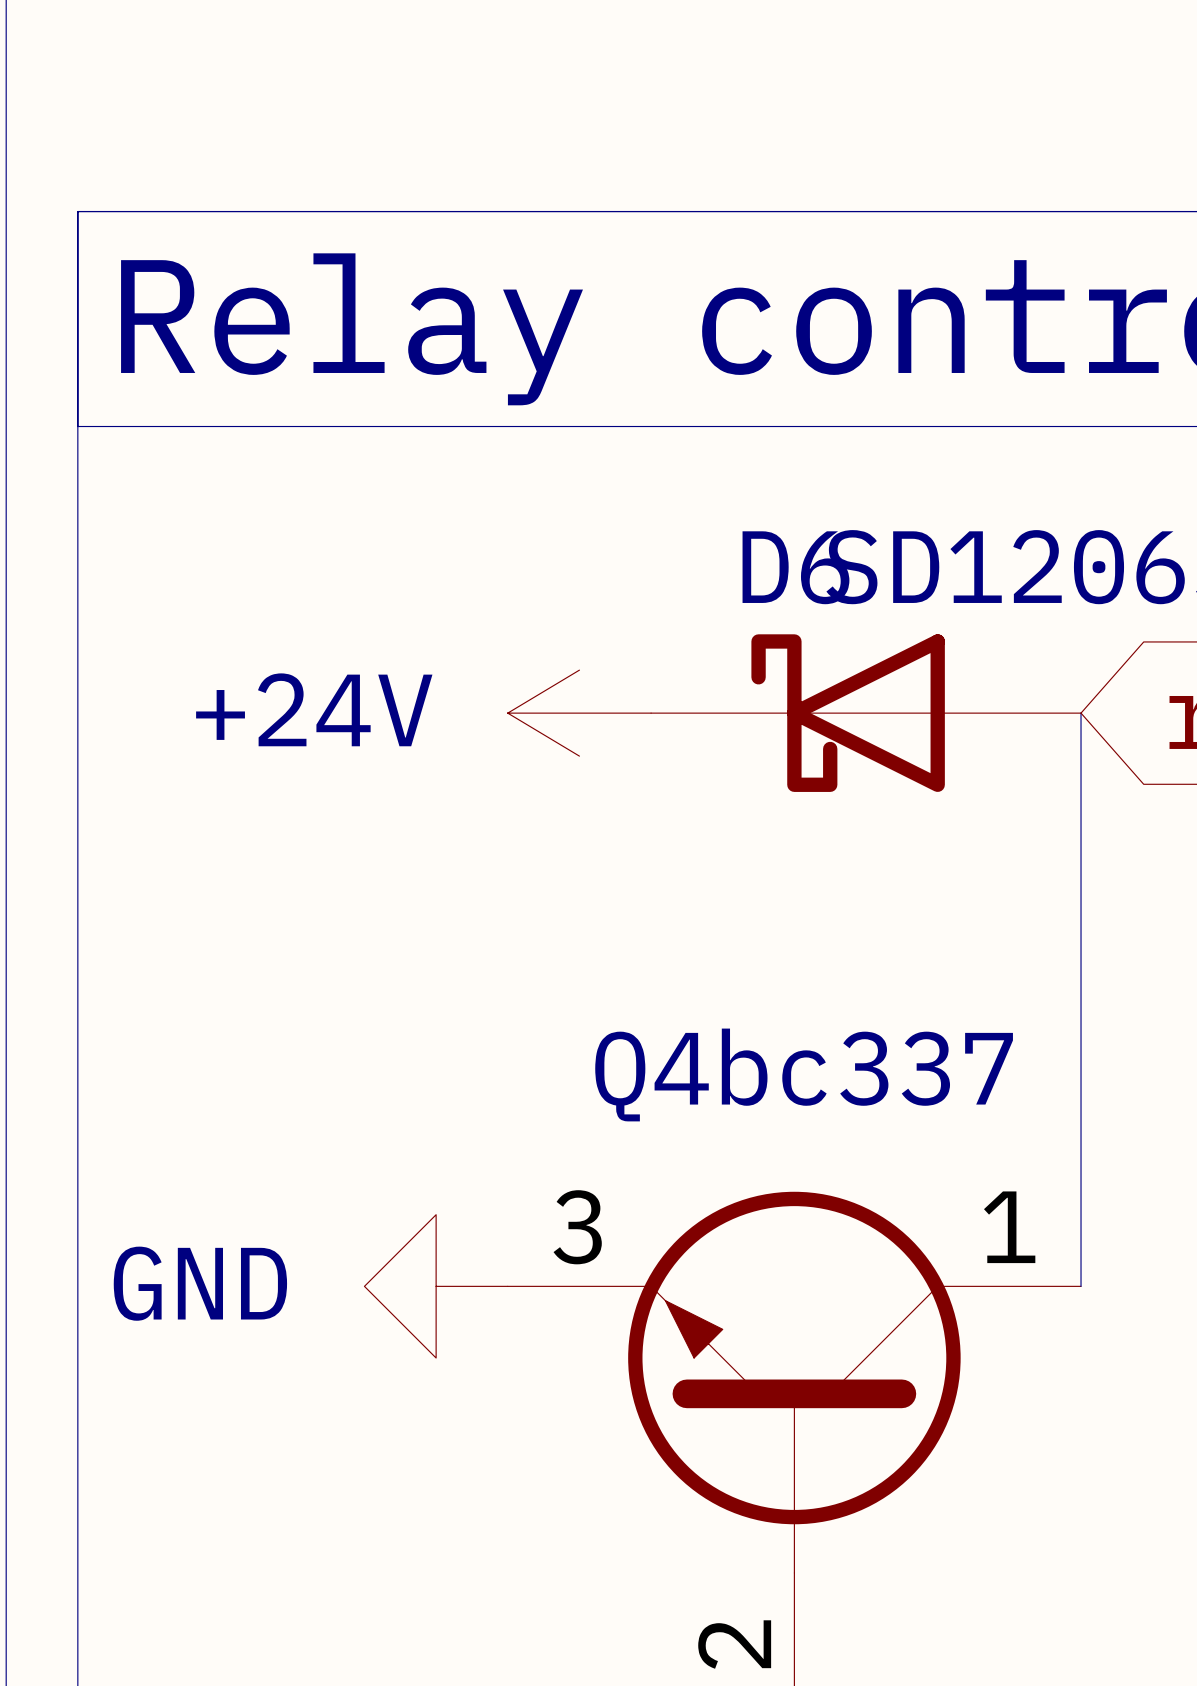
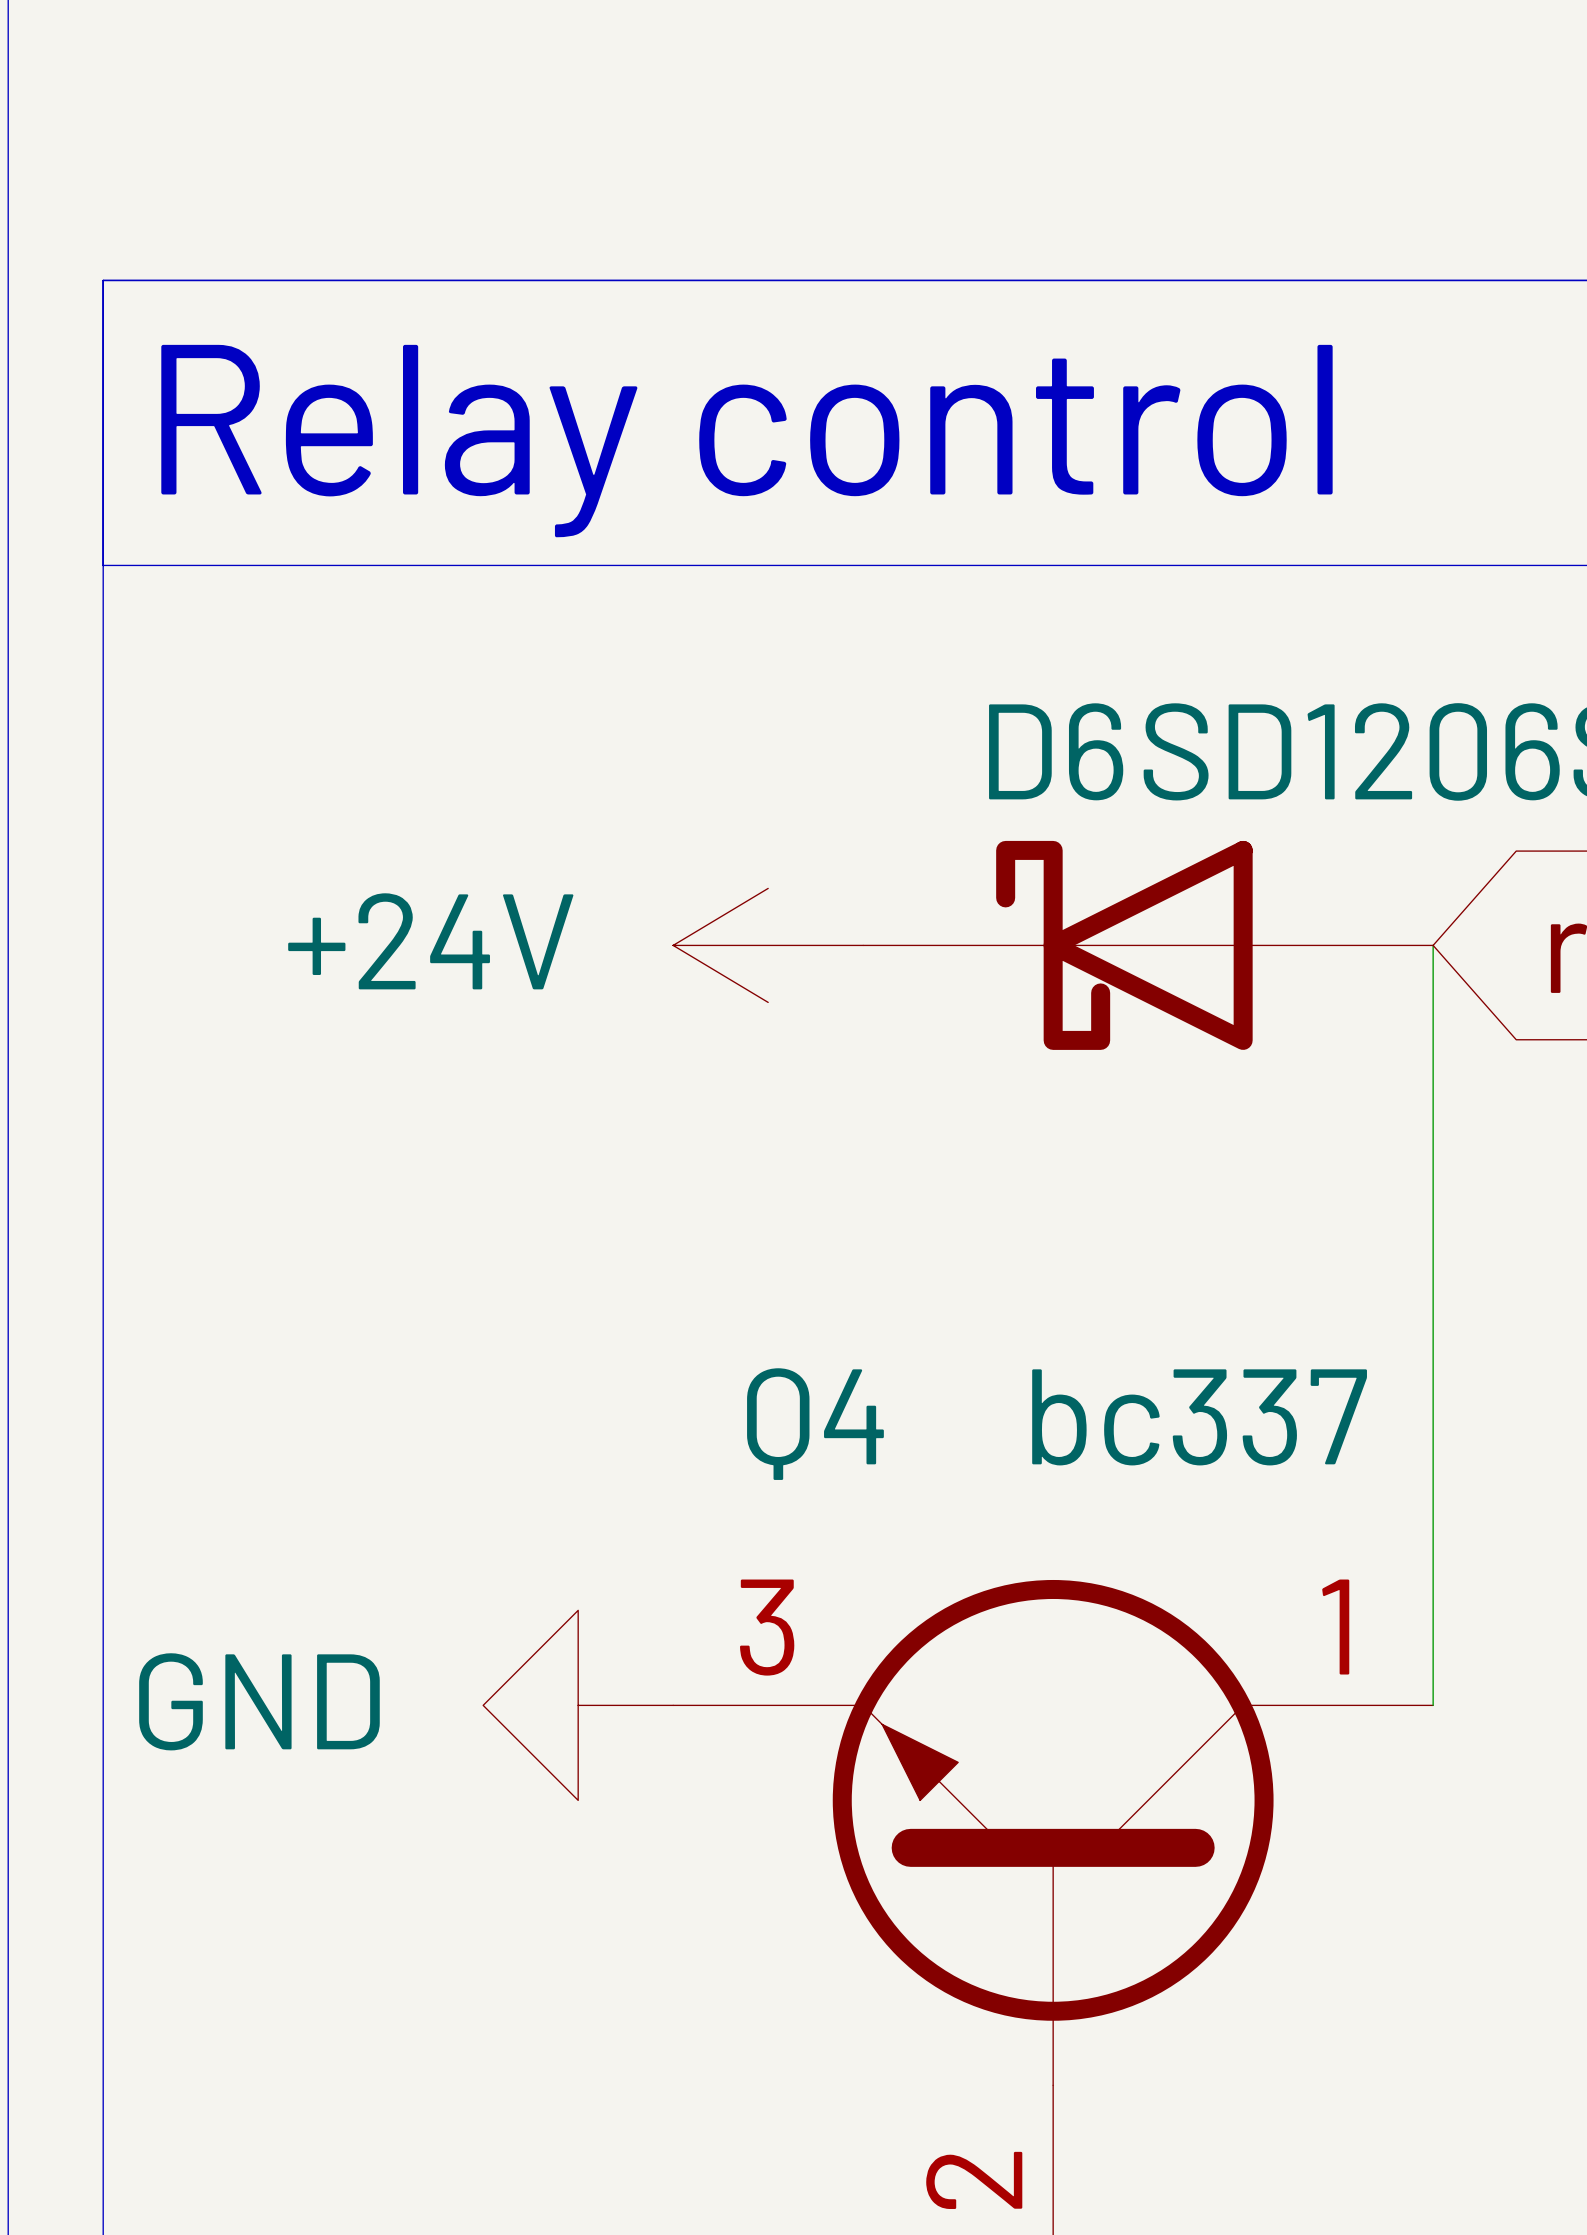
Q4 value position: bc337 (867, 1067) -> bc337 (1199, 1417)
Q4 name position: Q4 (652, 1076) -> Q4 (815, 1424)

